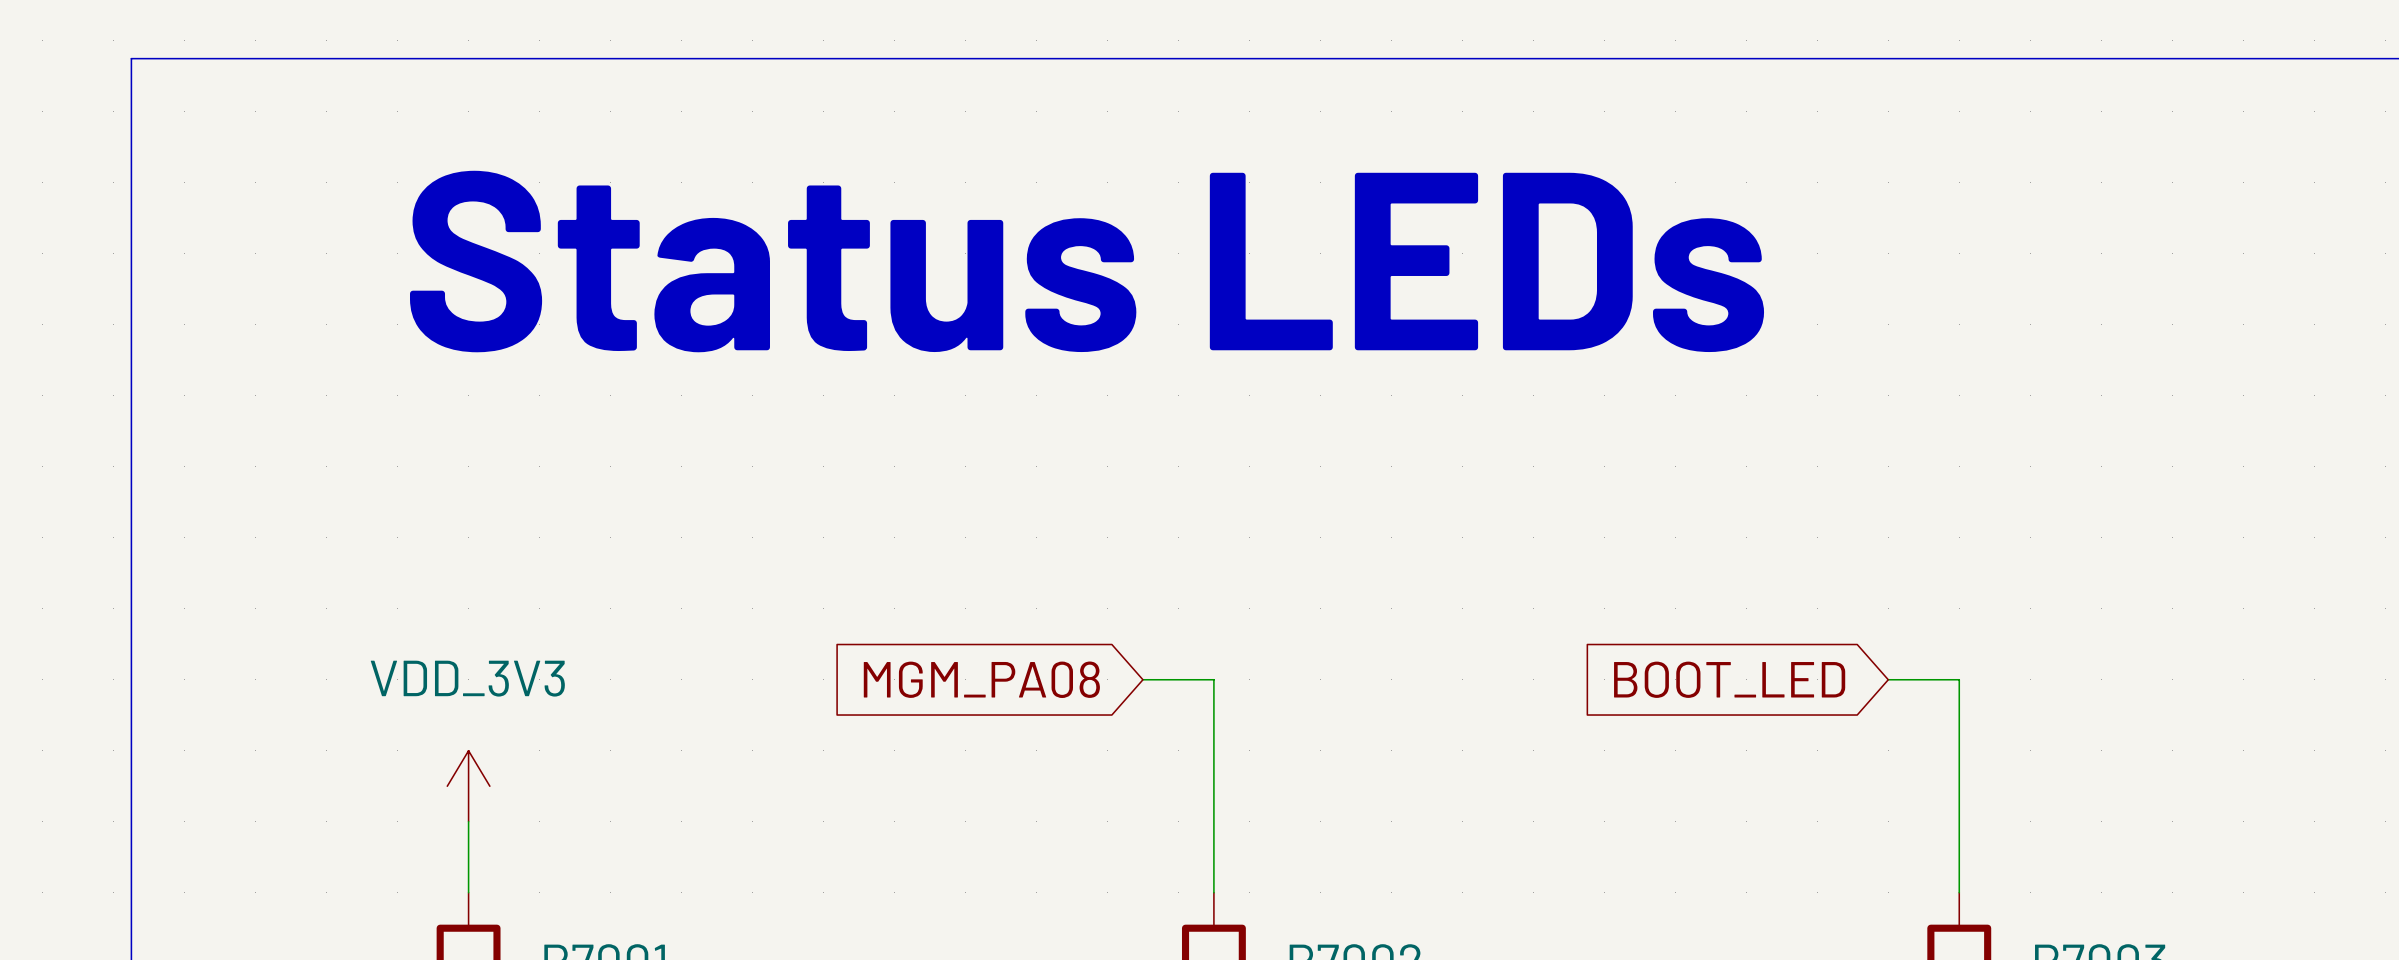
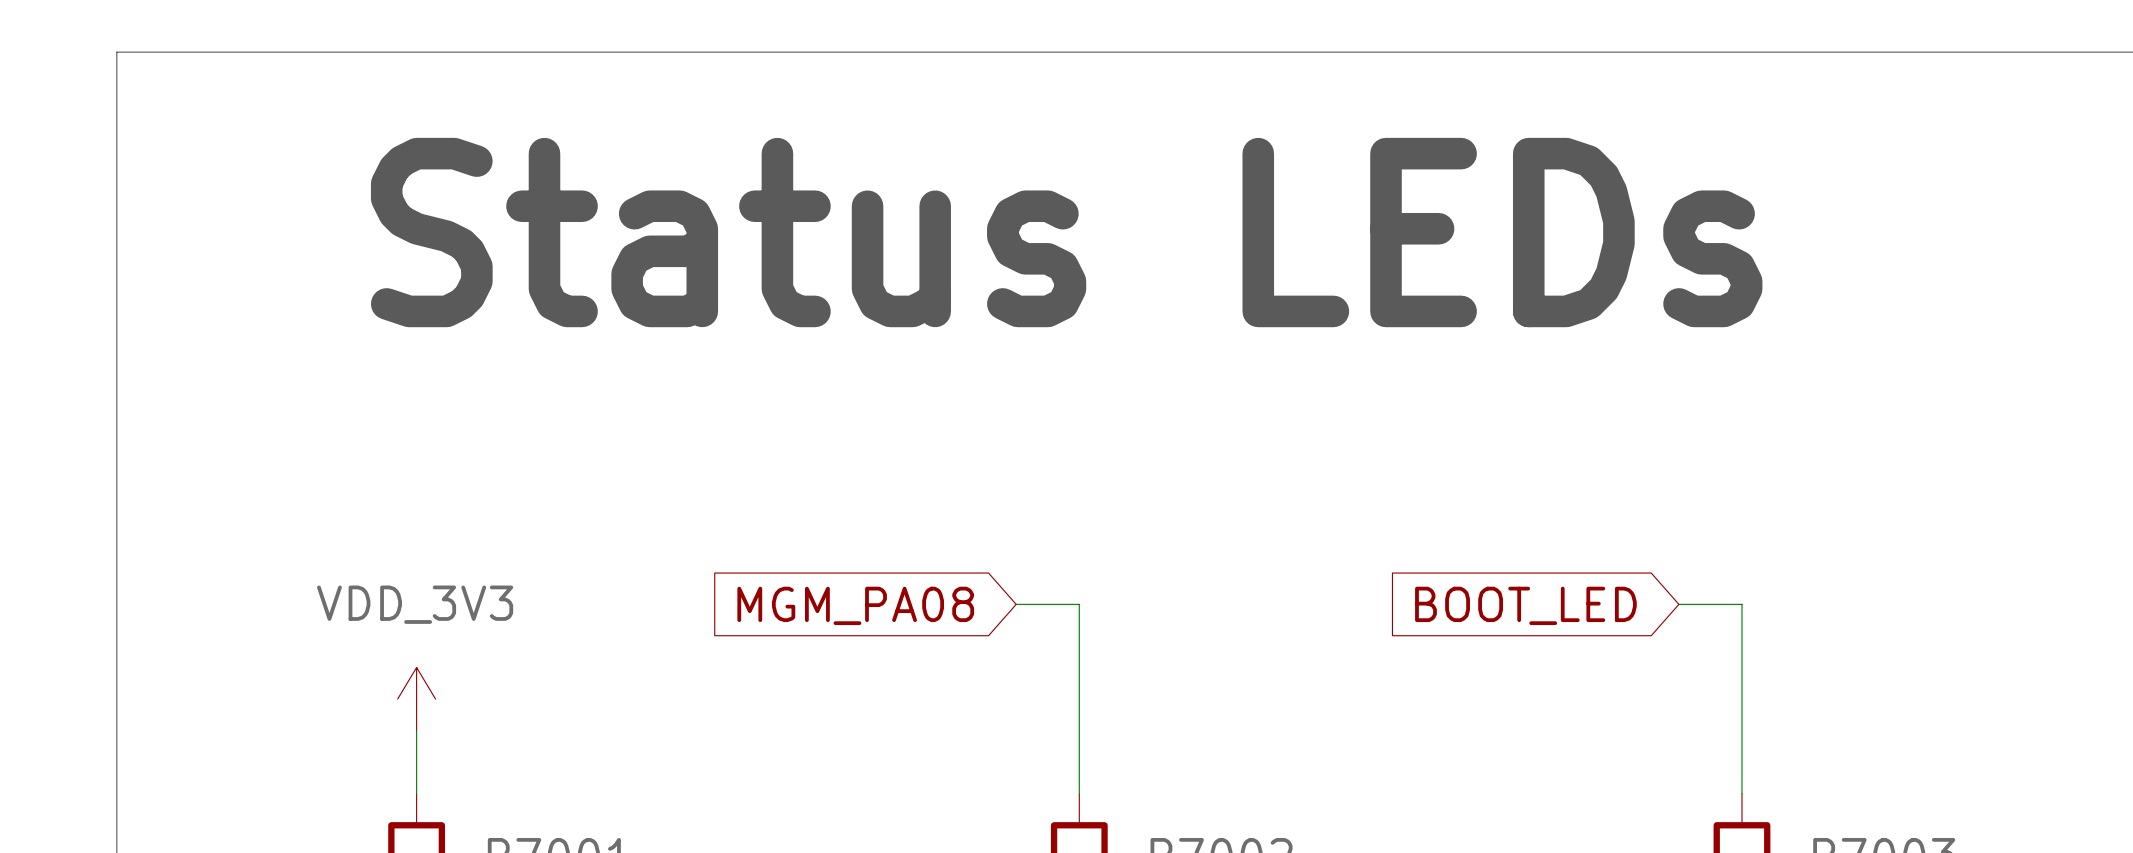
text position: Status LEDs (1087, 261) -> Status LEDs (1066, 232)

